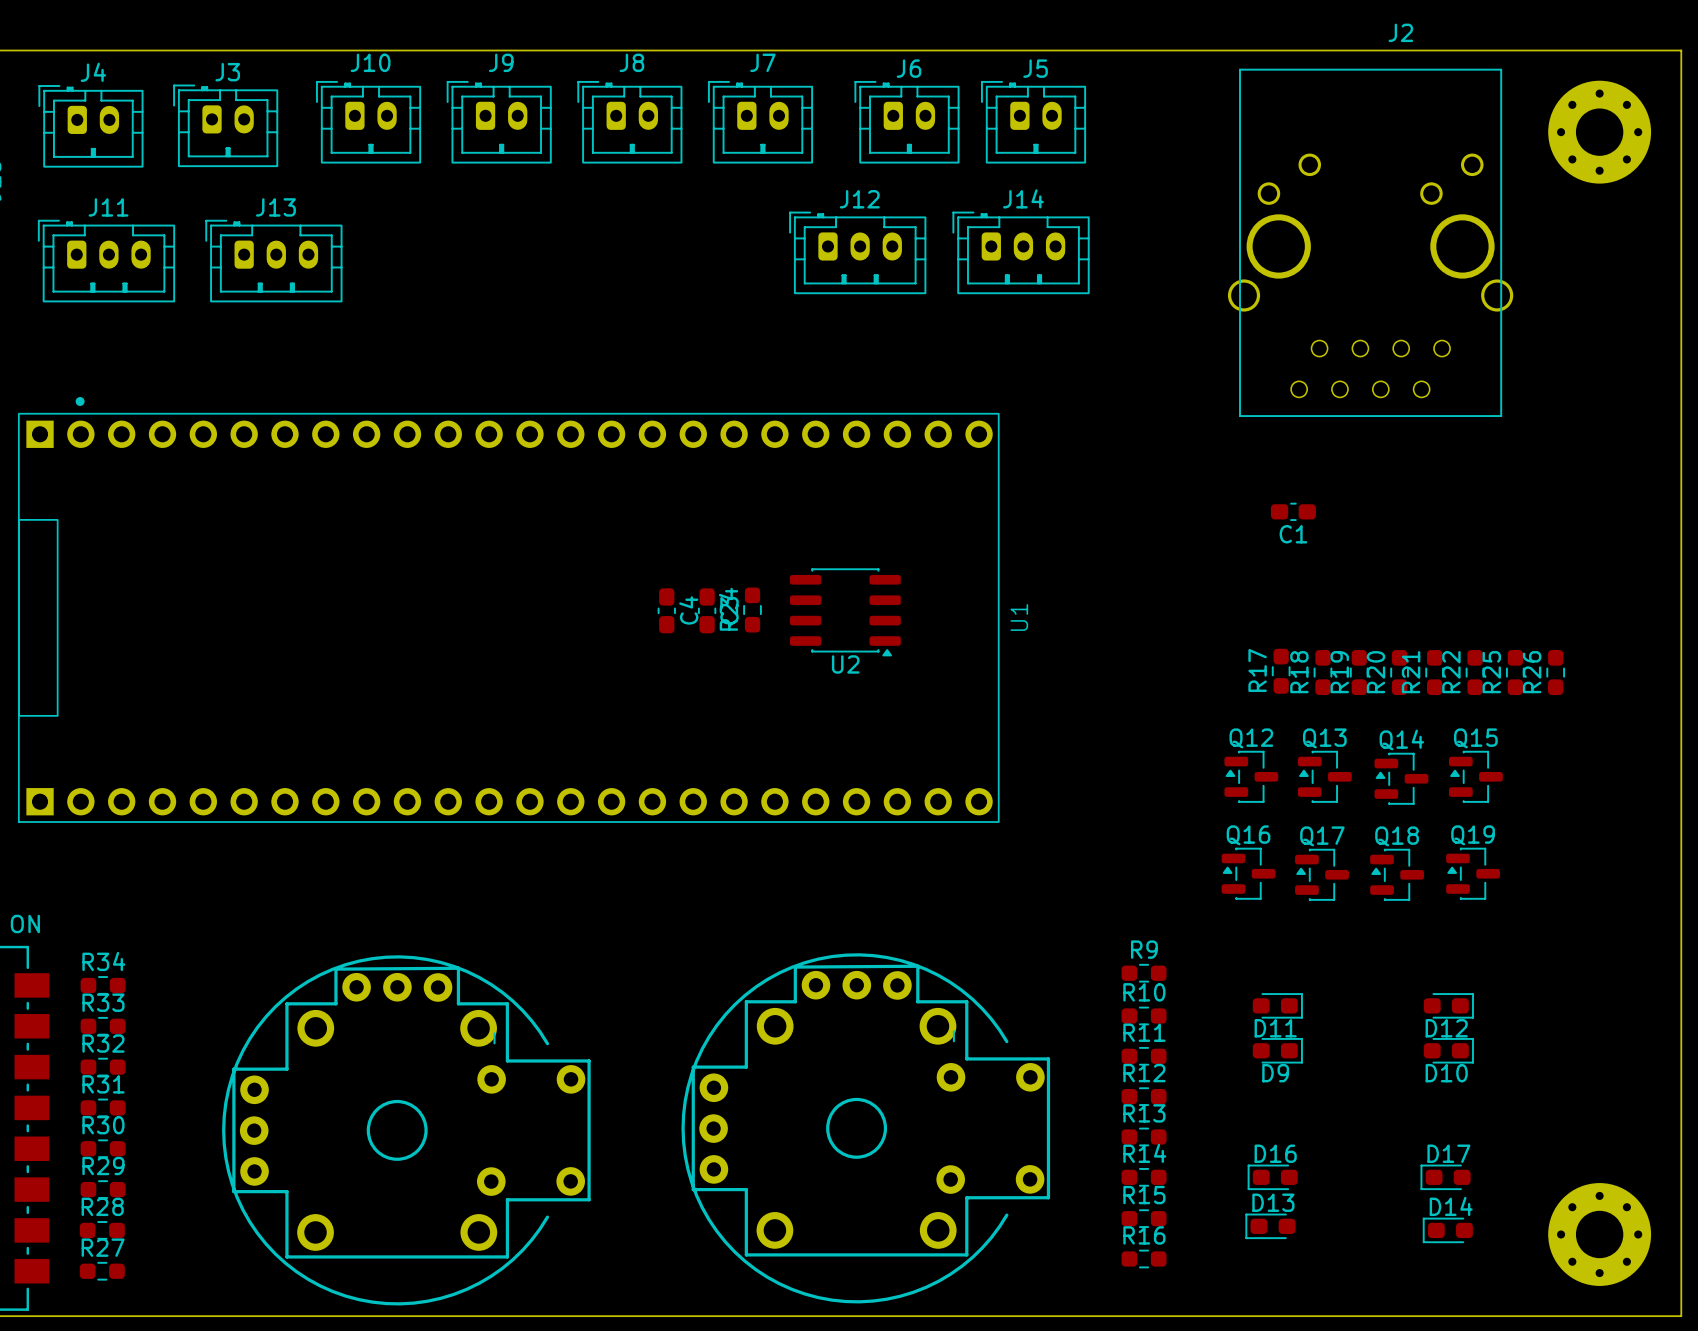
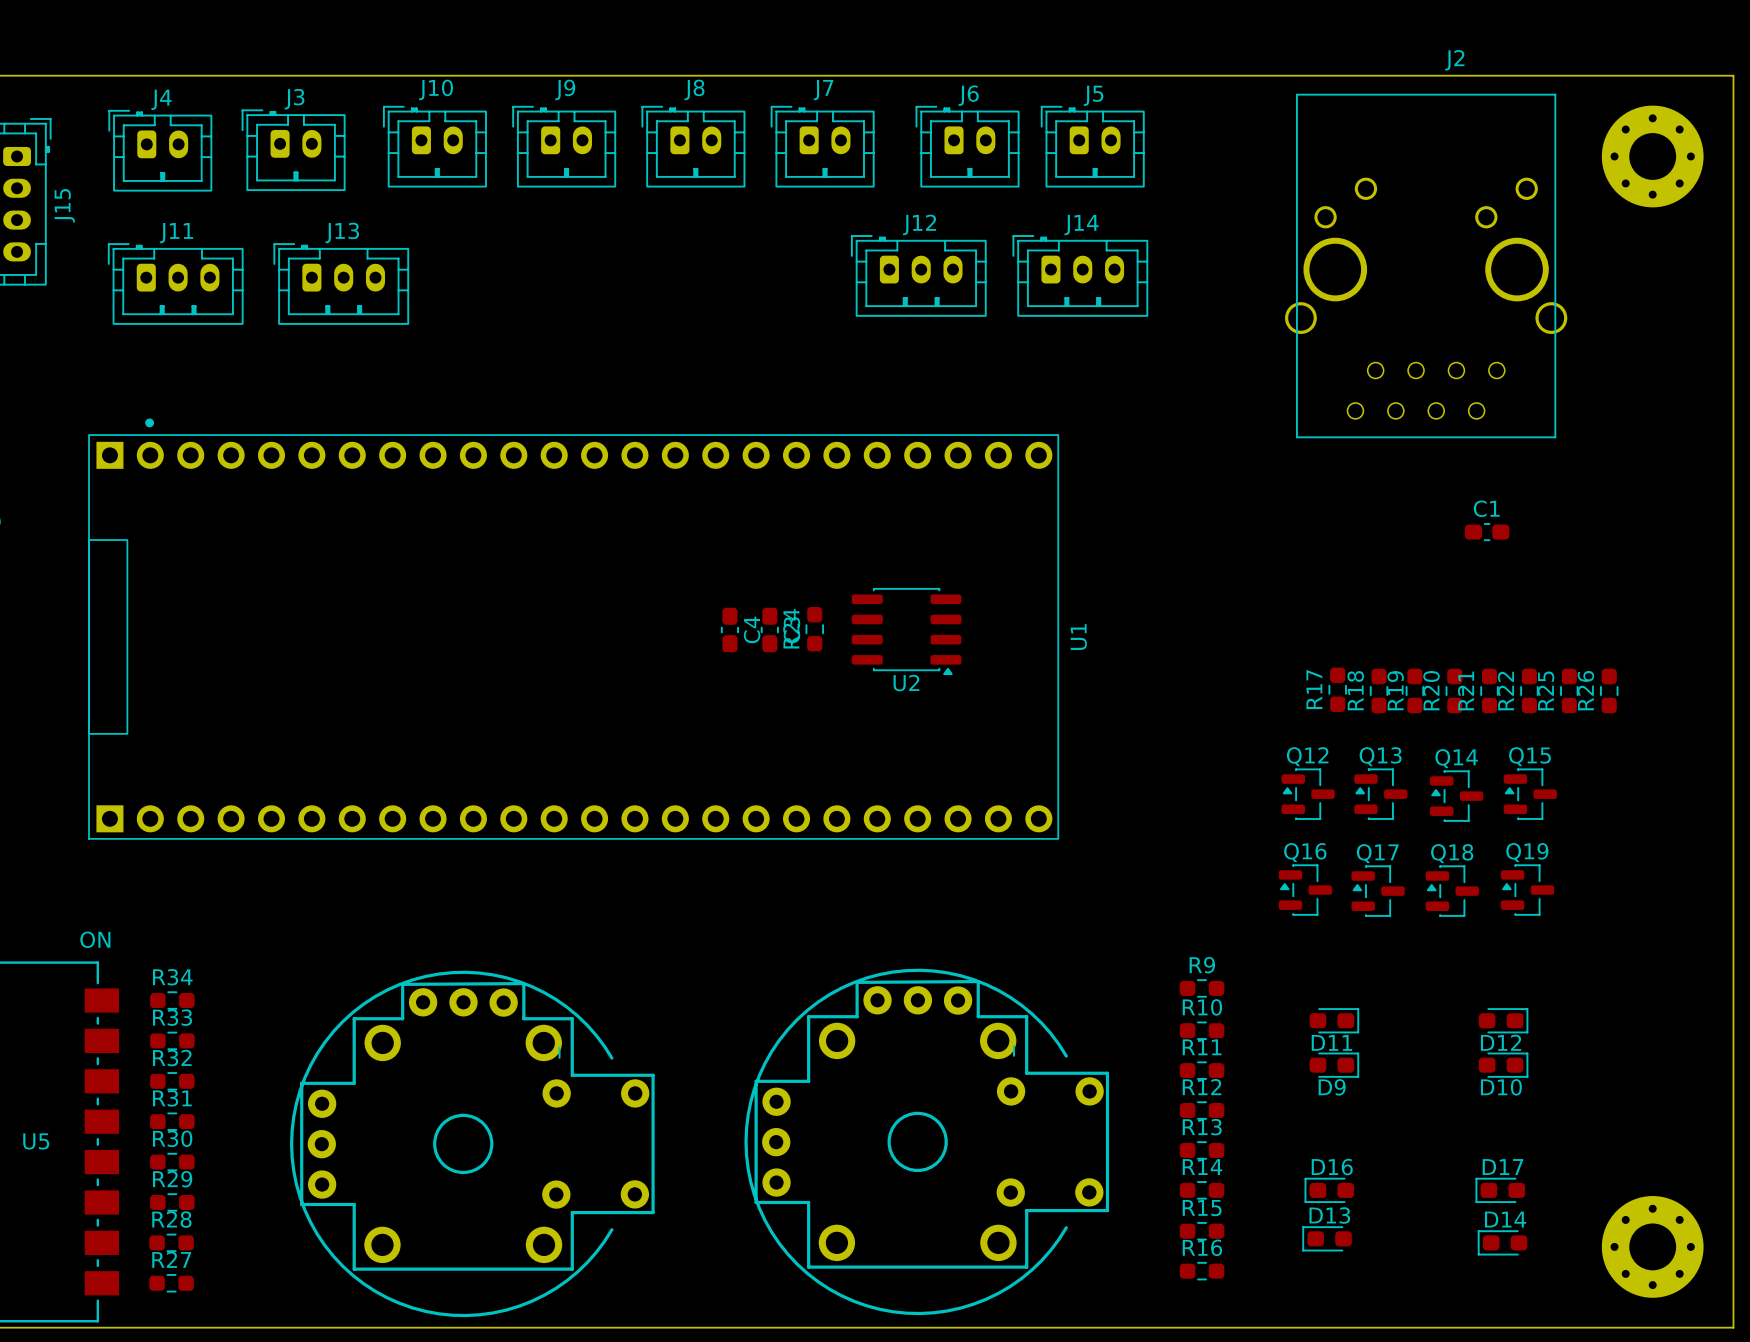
C1 position: (1293, 511) -> (1487, 532)
C1 name position: C1 (1293, 534) -> C1 (1486, 508)

